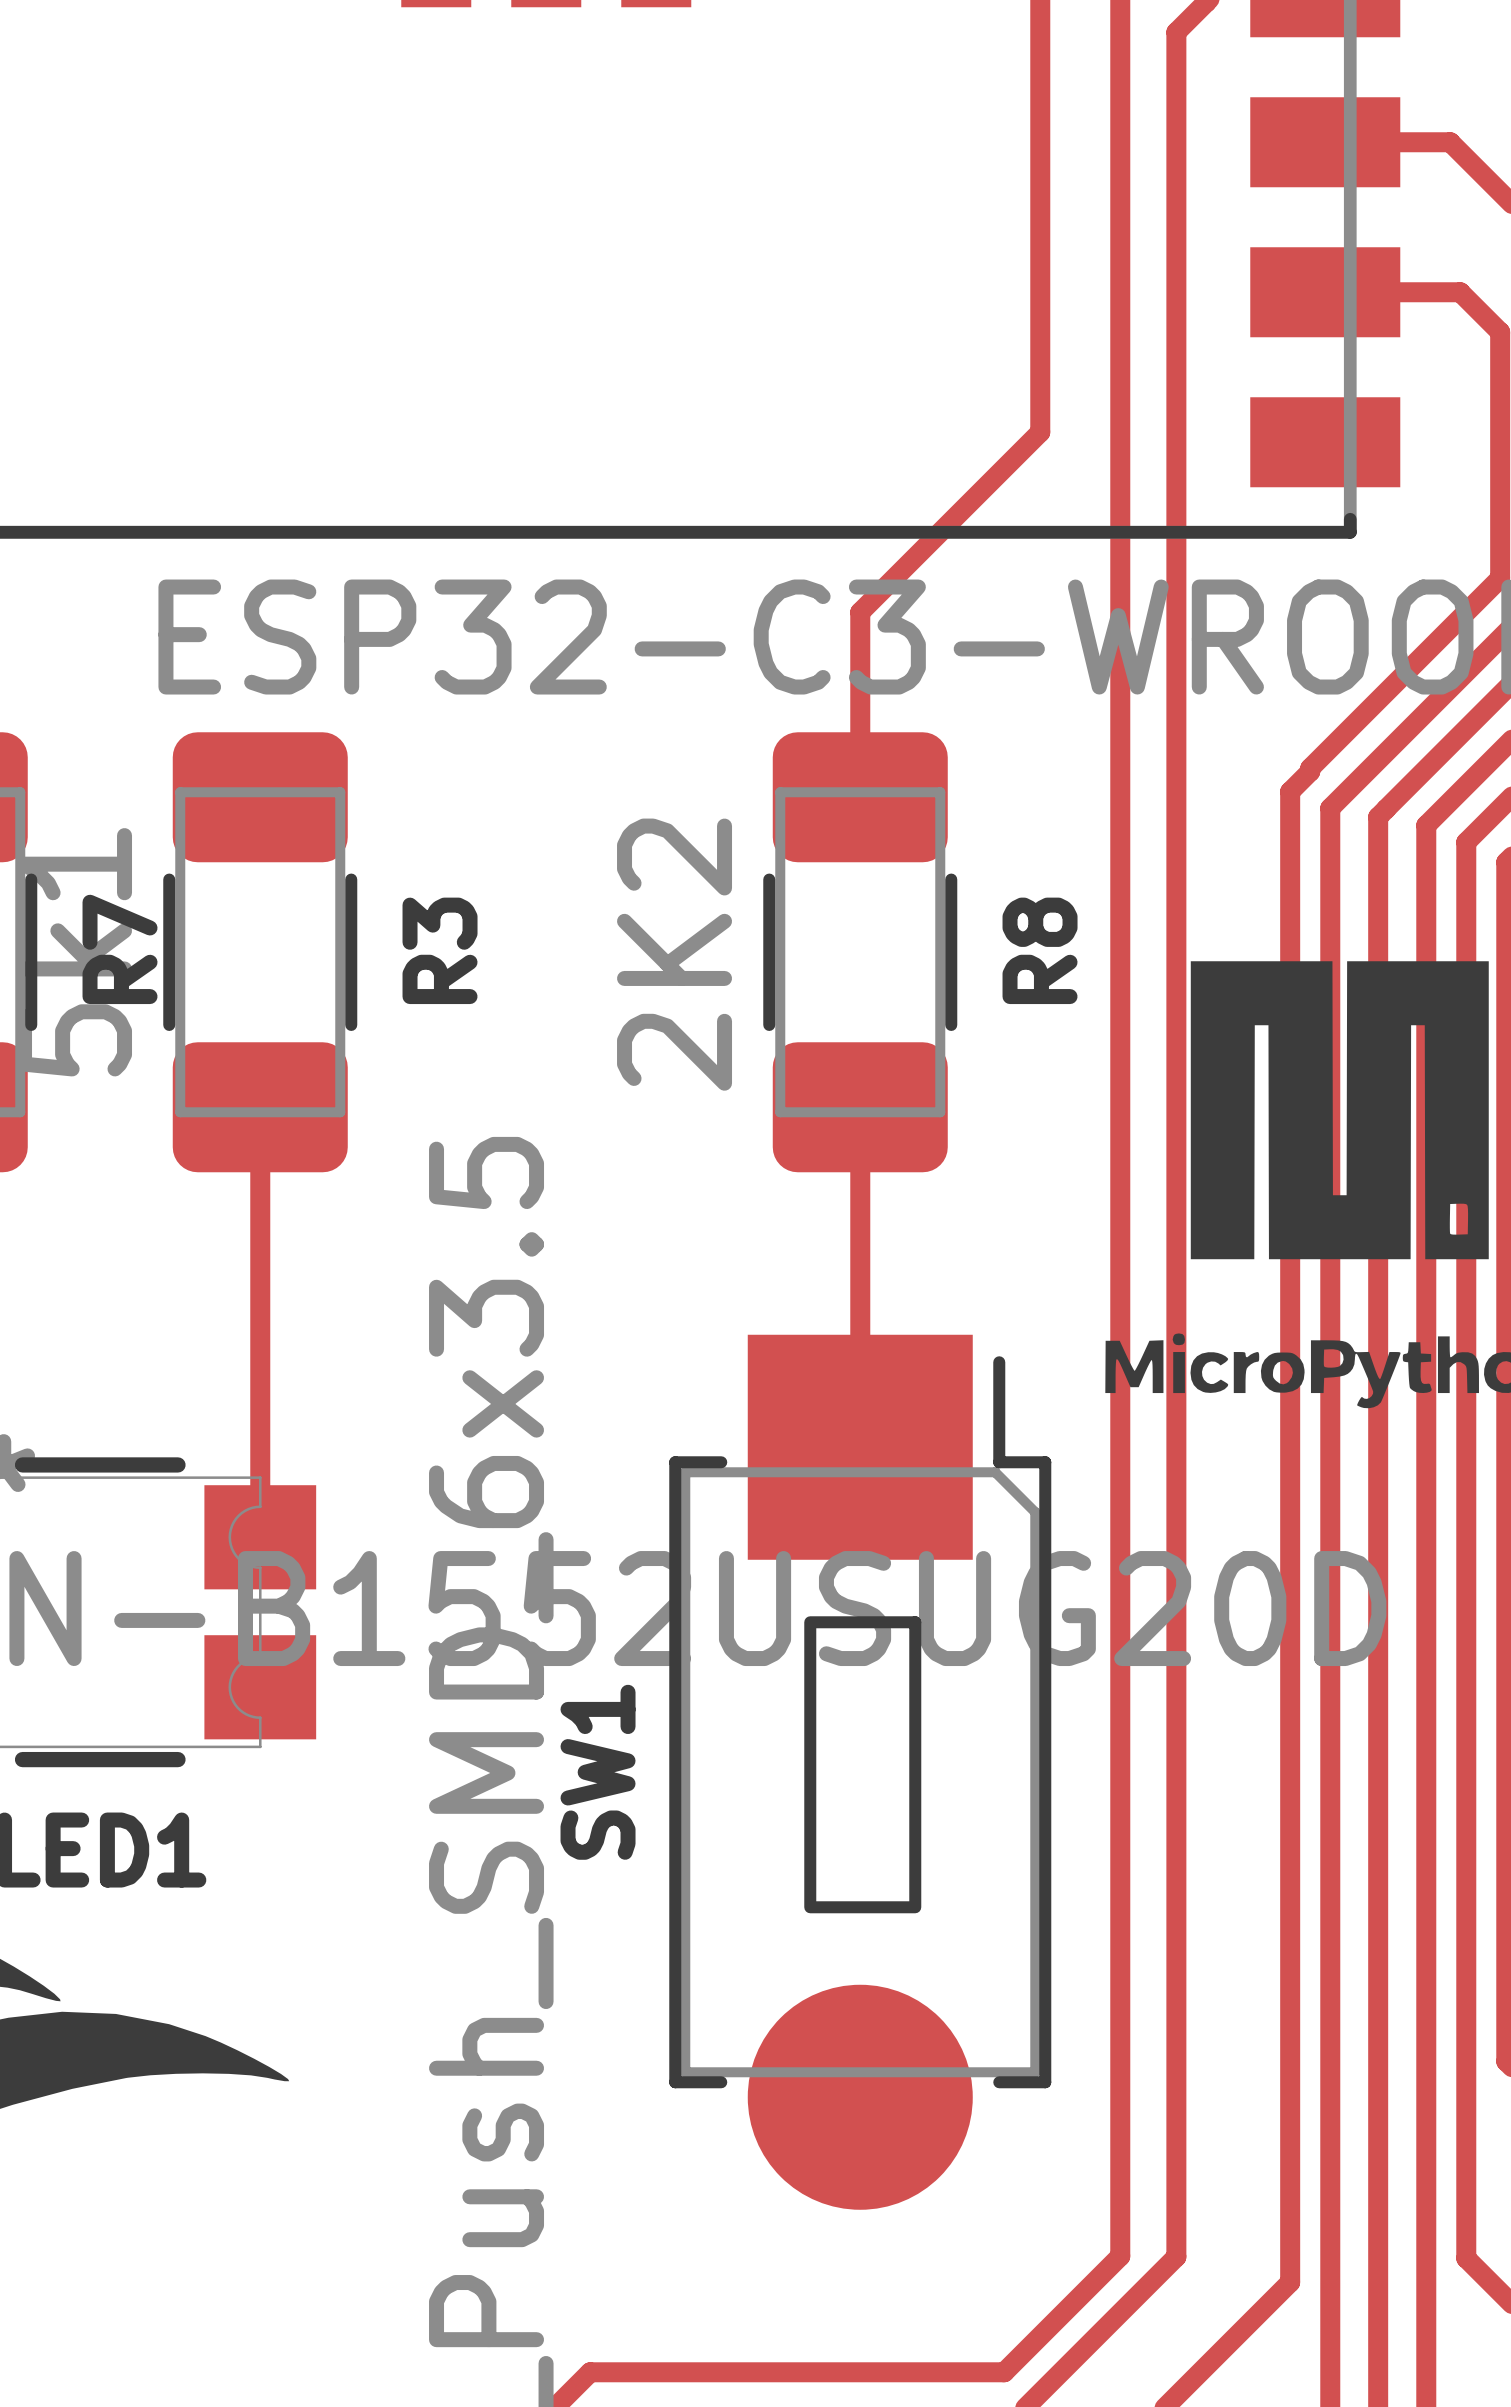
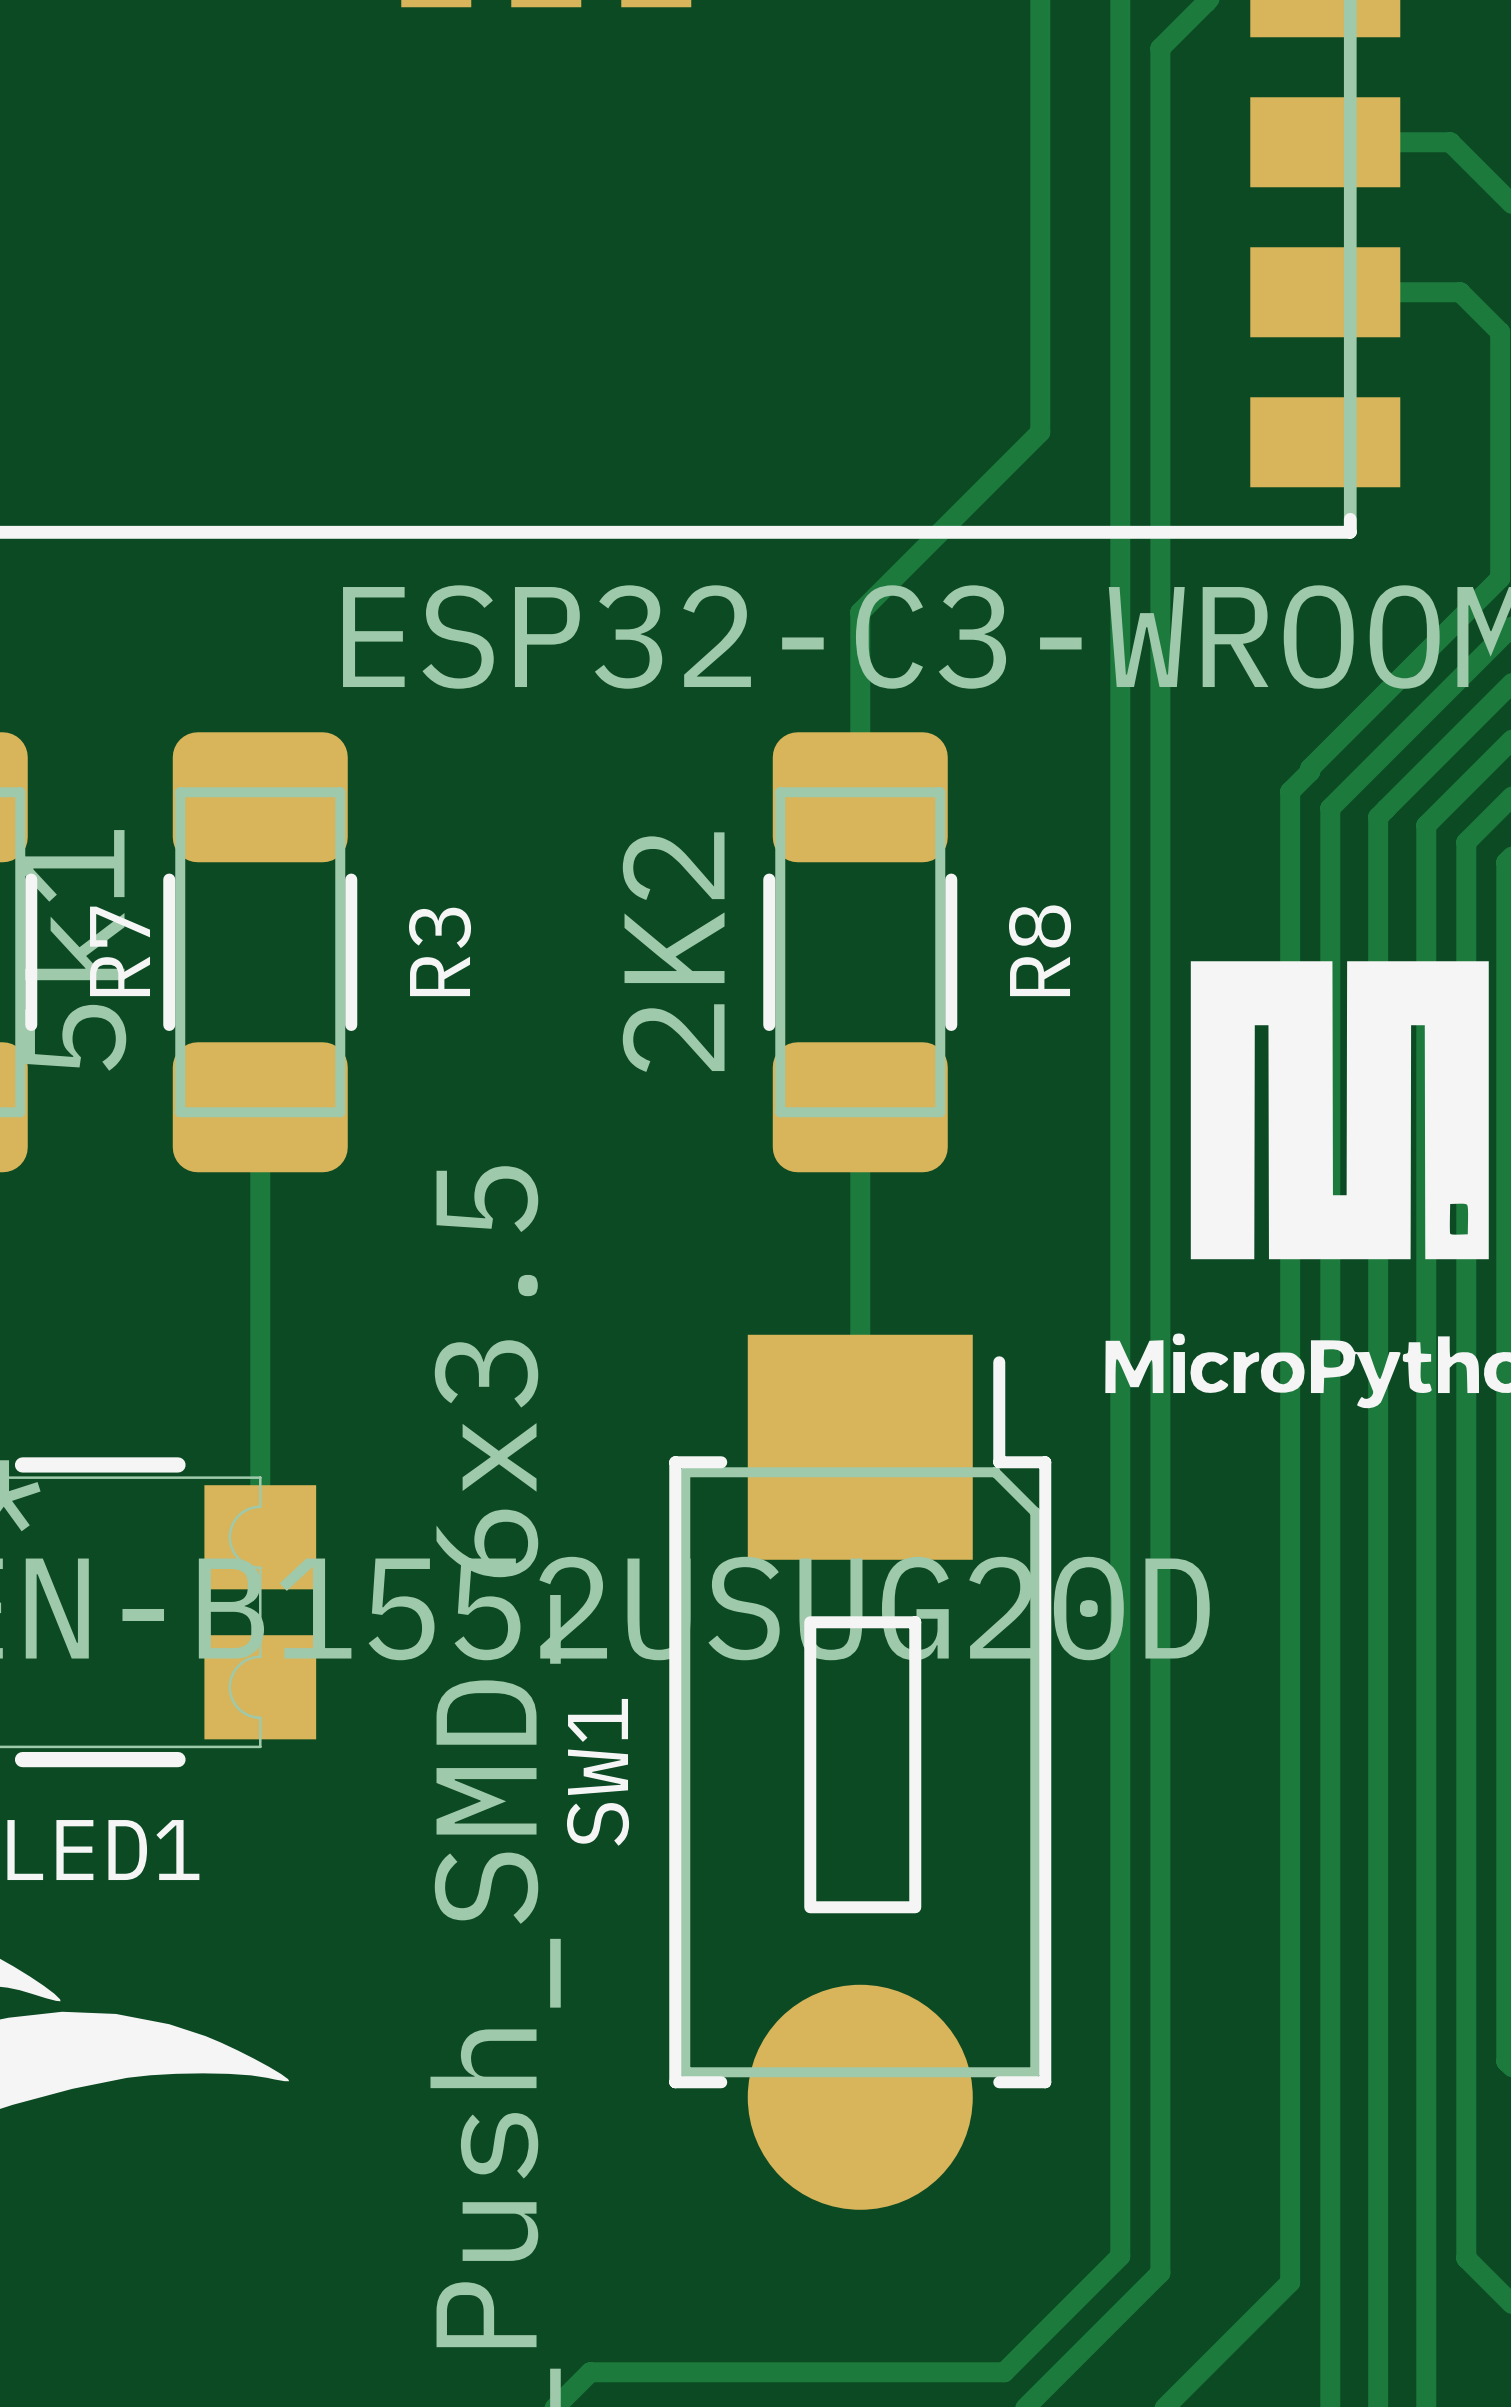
track: (1176, 32) (1176, 2256) (1160, 2272) -> (1176, 32) (1160, 48) (1160, 2272)

